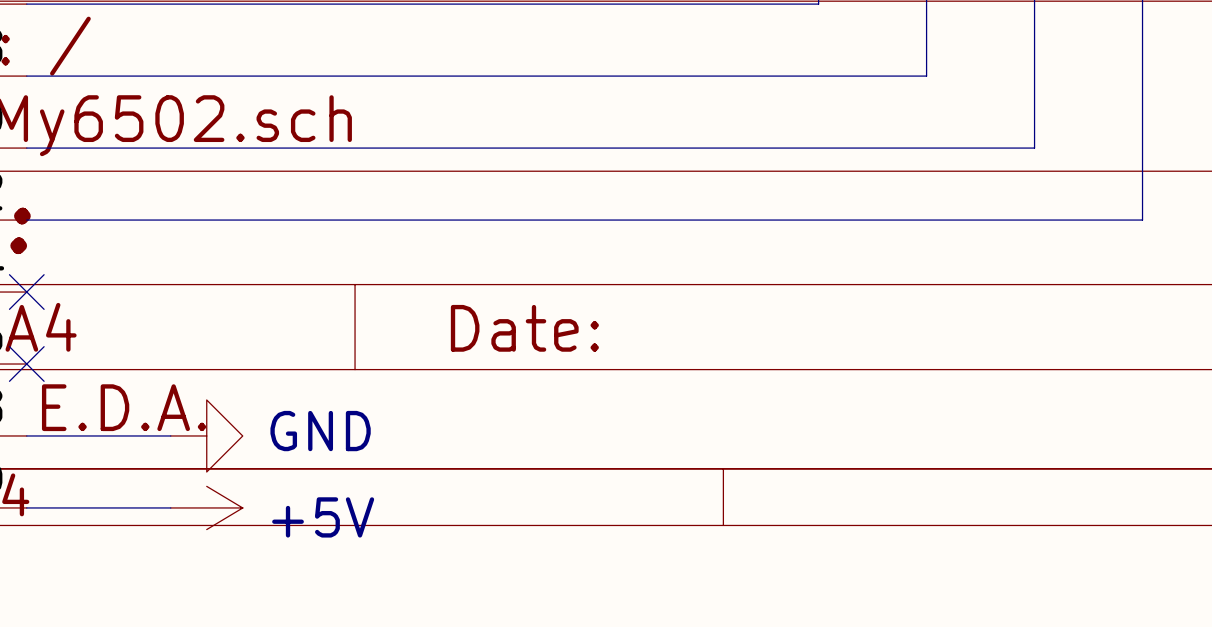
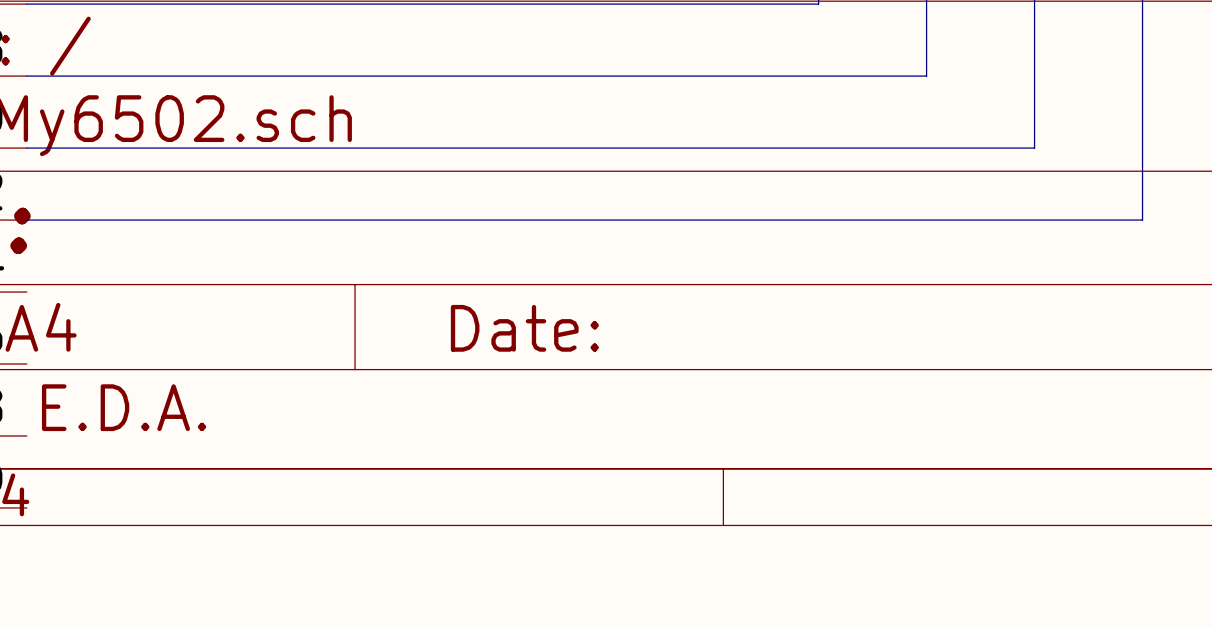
no-connect mark: (26, 292) -> none
no-connect mark: (26, 364) -> none
wire: (26, 435) (170, 435) -> none
power symbol: GND (206, 435) -> none
wire: (26, 507) (170, 507) -> none
power symbol: +5V (206, 507) -> none

